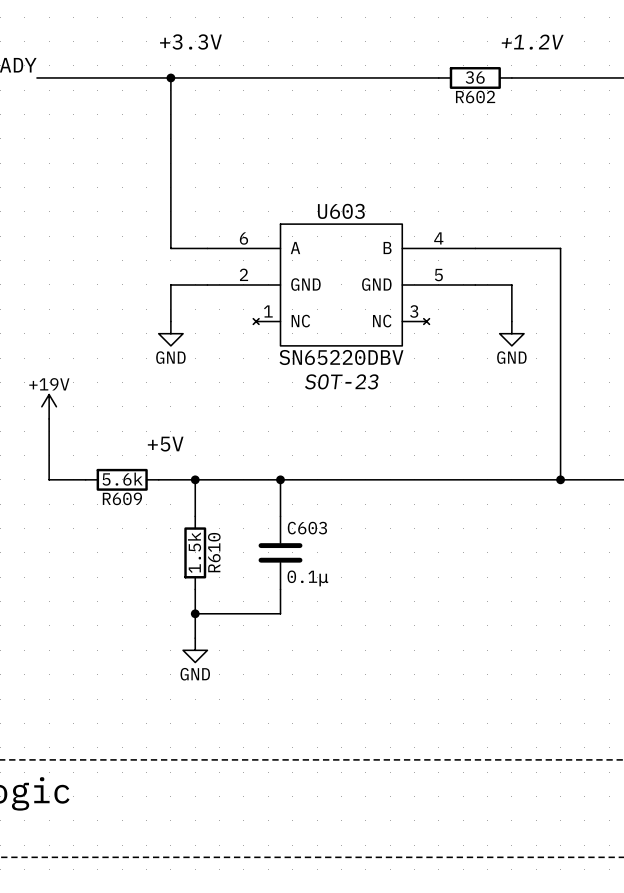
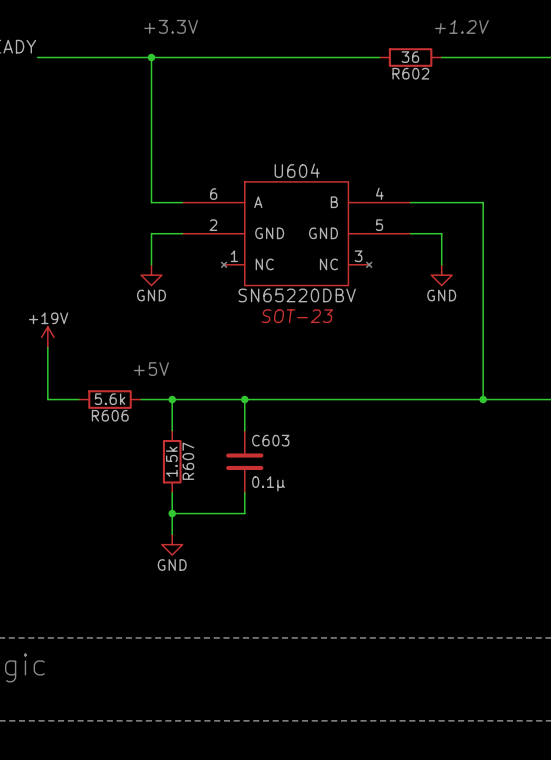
U603 name: U603 (341, 211) -> U604 (297, 170)
R609 name: R609 (122, 498) -> R606 (110, 415)
R610 name: R610 (214, 552) -> R607 (188, 461)

